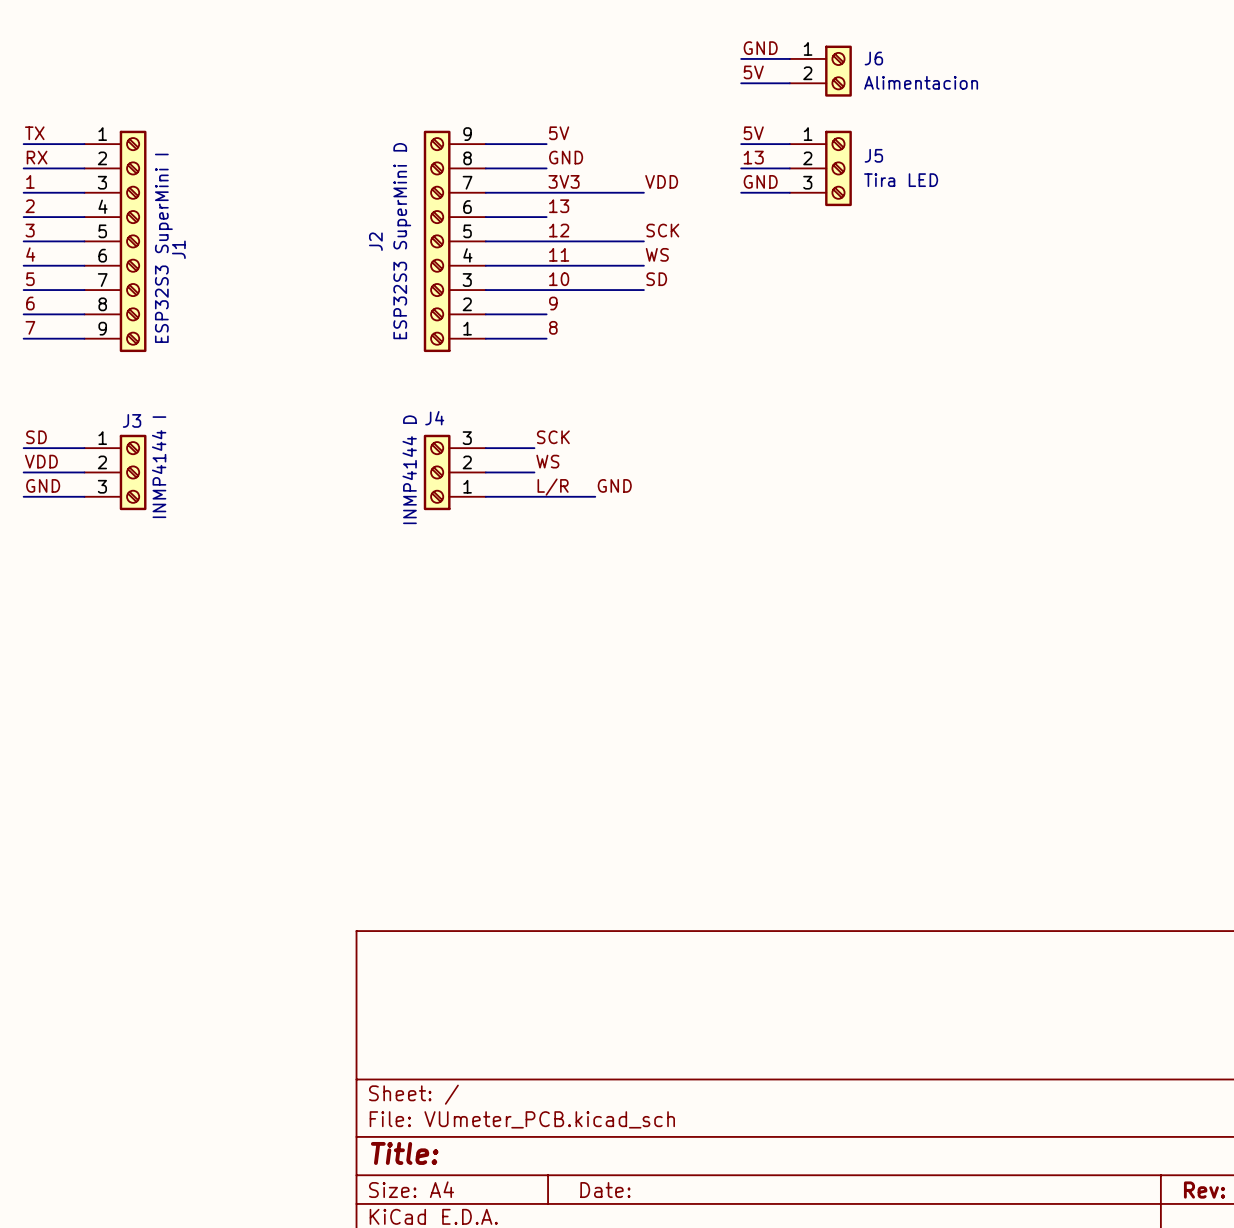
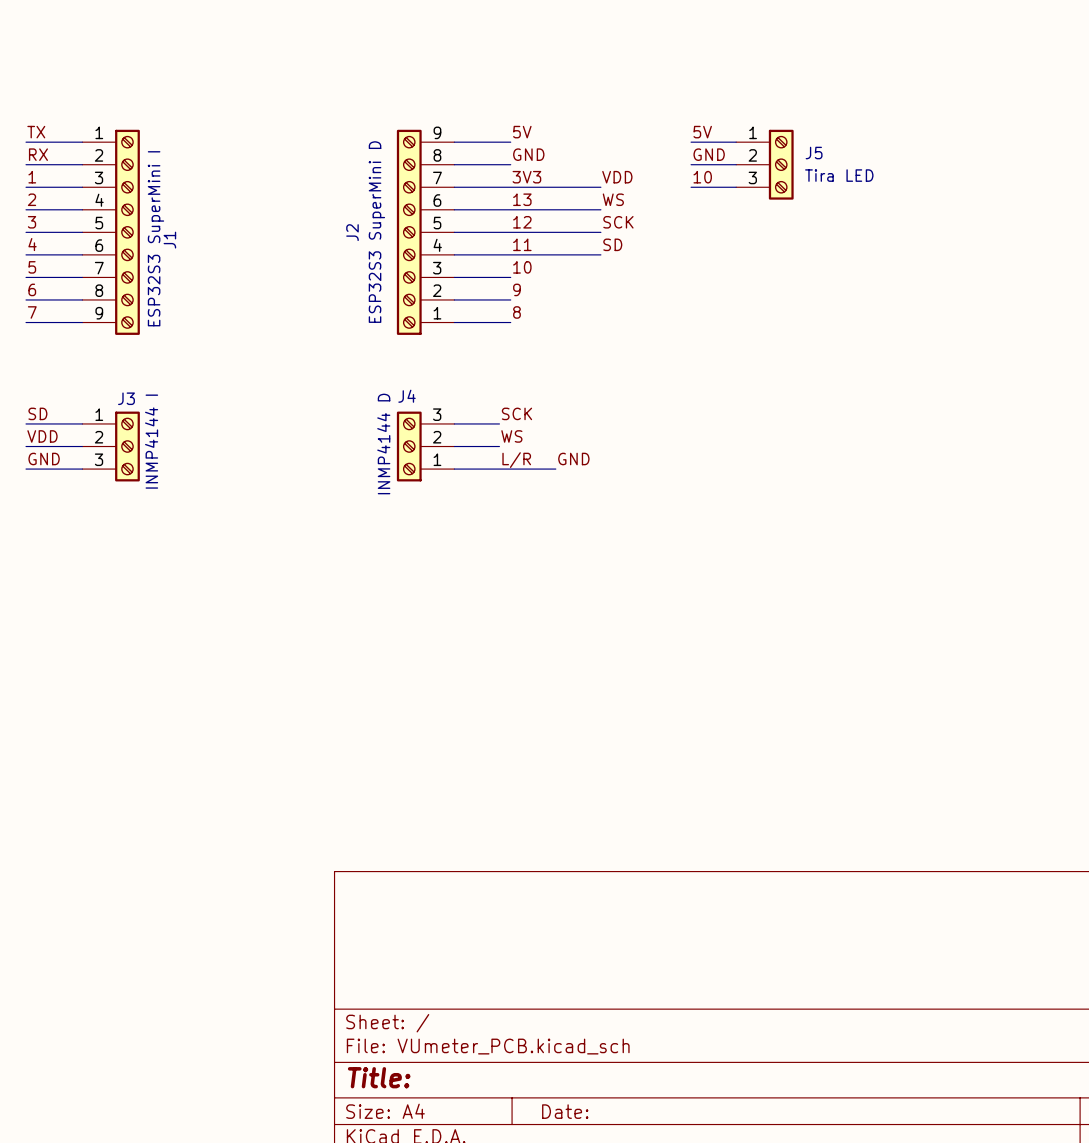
label: GND (760, 48) -> none
wire: (741, 58) (789, 58) -> none
J6: Alimentacion (820, 71) -> none
label: 5V (753, 72) -> none
wire: (741, 83) (789, 83) -> none
label: 13 (753, 157) -> GND (709, 154)
label: GND (760, 181) -> 10 (702, 177)
label: none -> WS (613, 199)
label: WS (657, 254) -> SD (612, 244)
label: SD (656, 279) -> none
wire: (546, 290) (643, 290) -> (510, 209) (600, 209)

